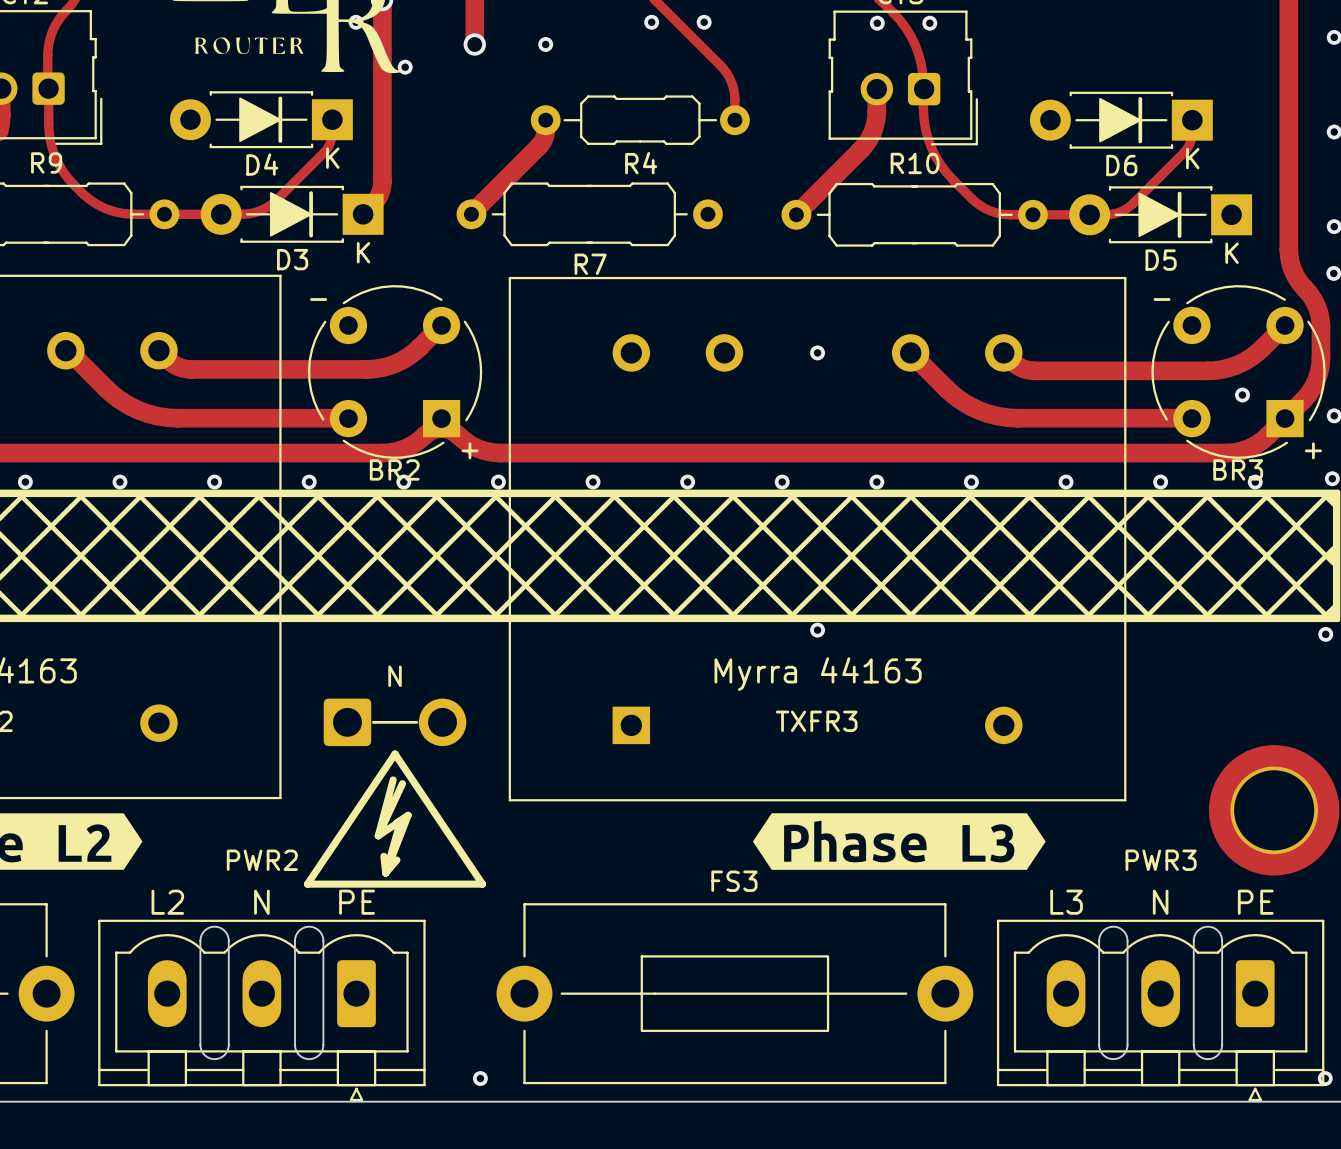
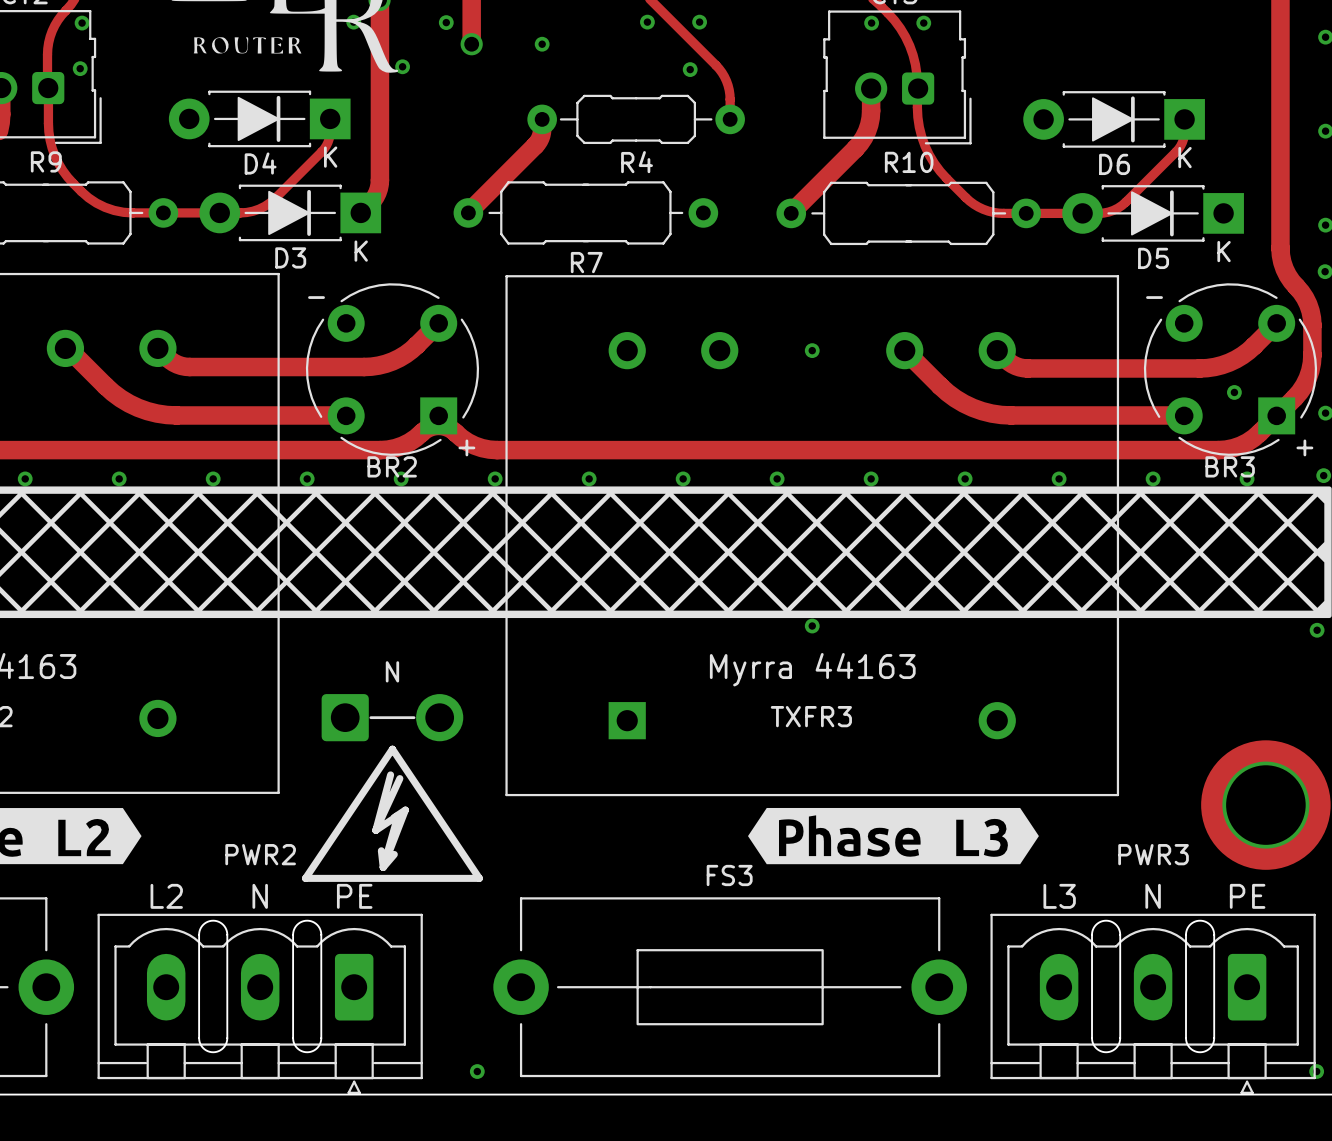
via: none -> (446, 22)
via: none -> (82, 23)
via: none -> (80, 68)
via: none -> (690, 69)

